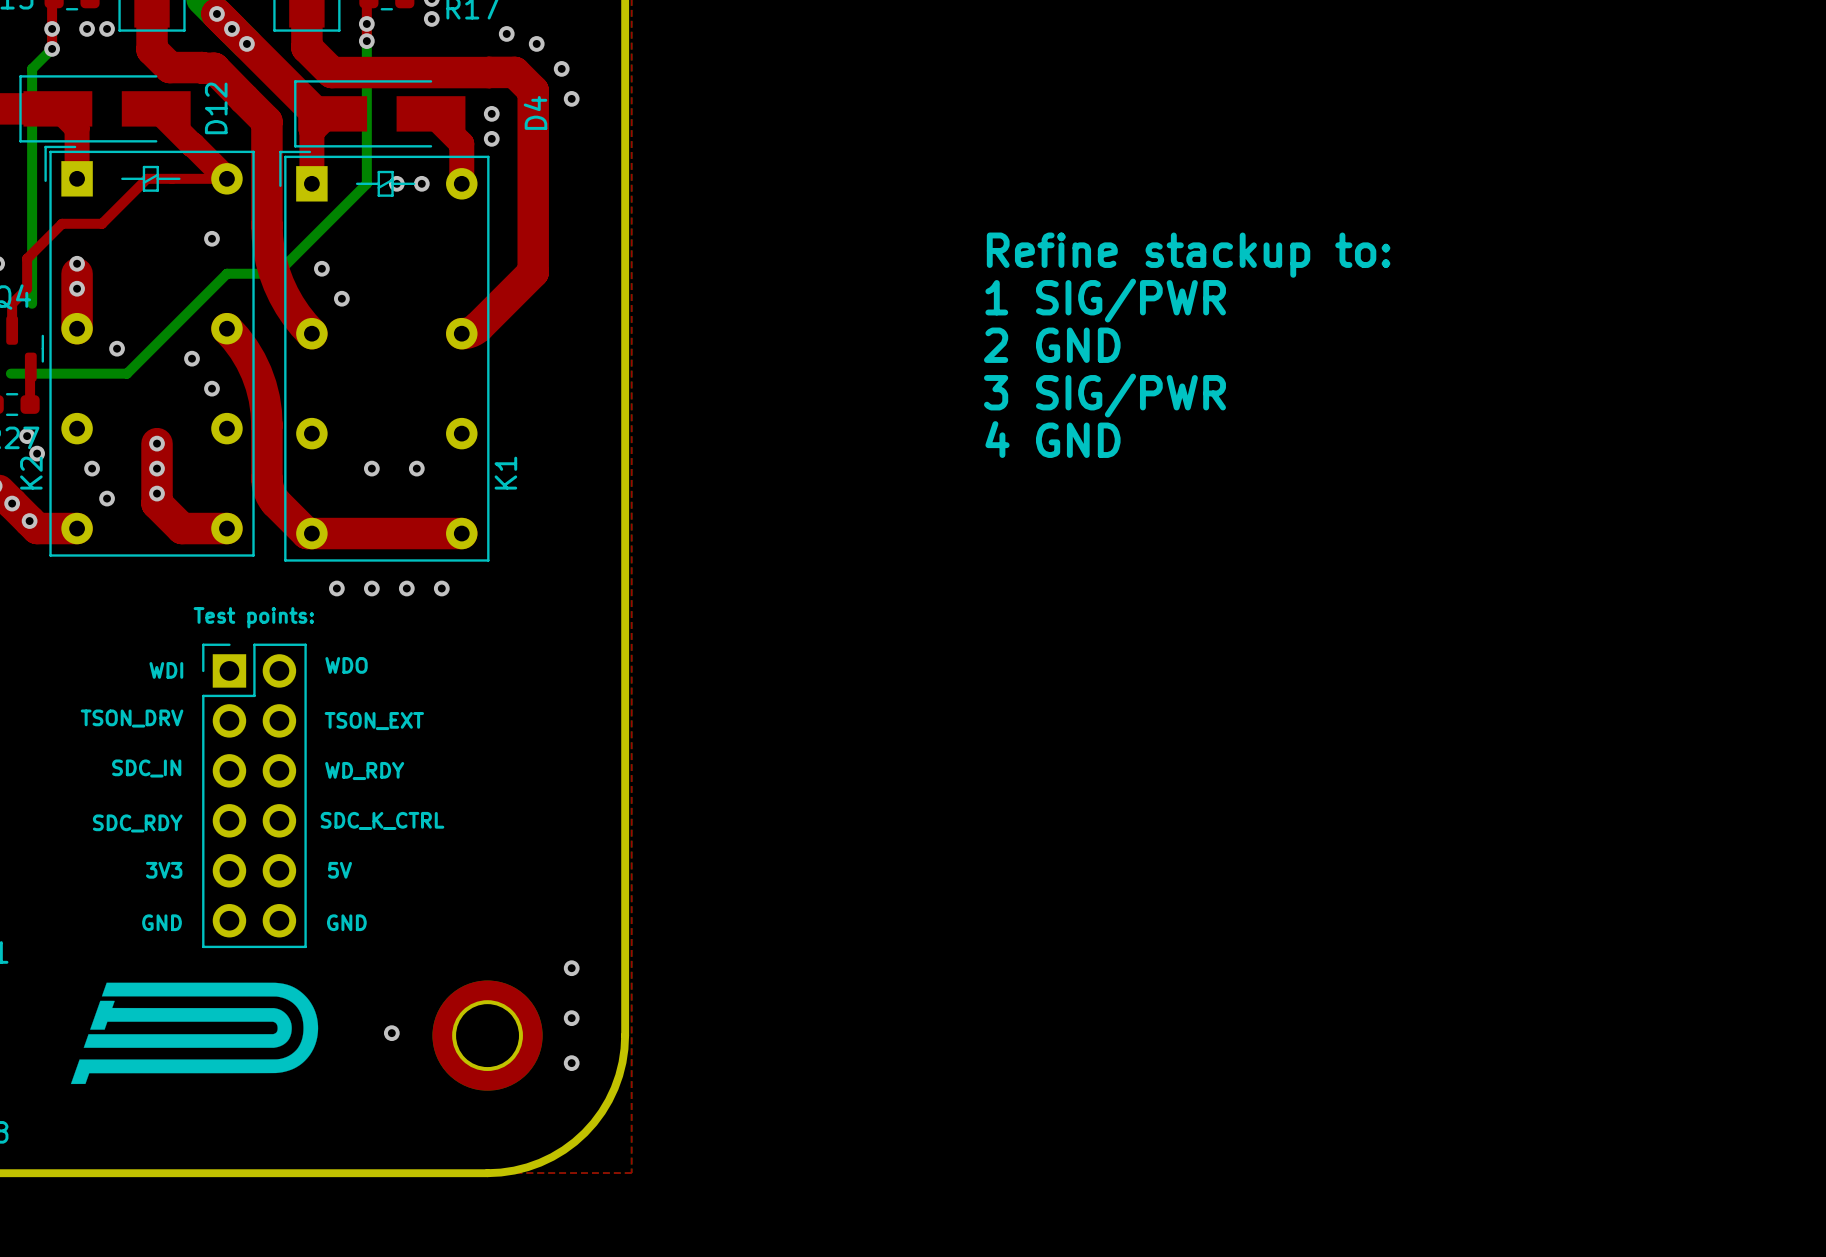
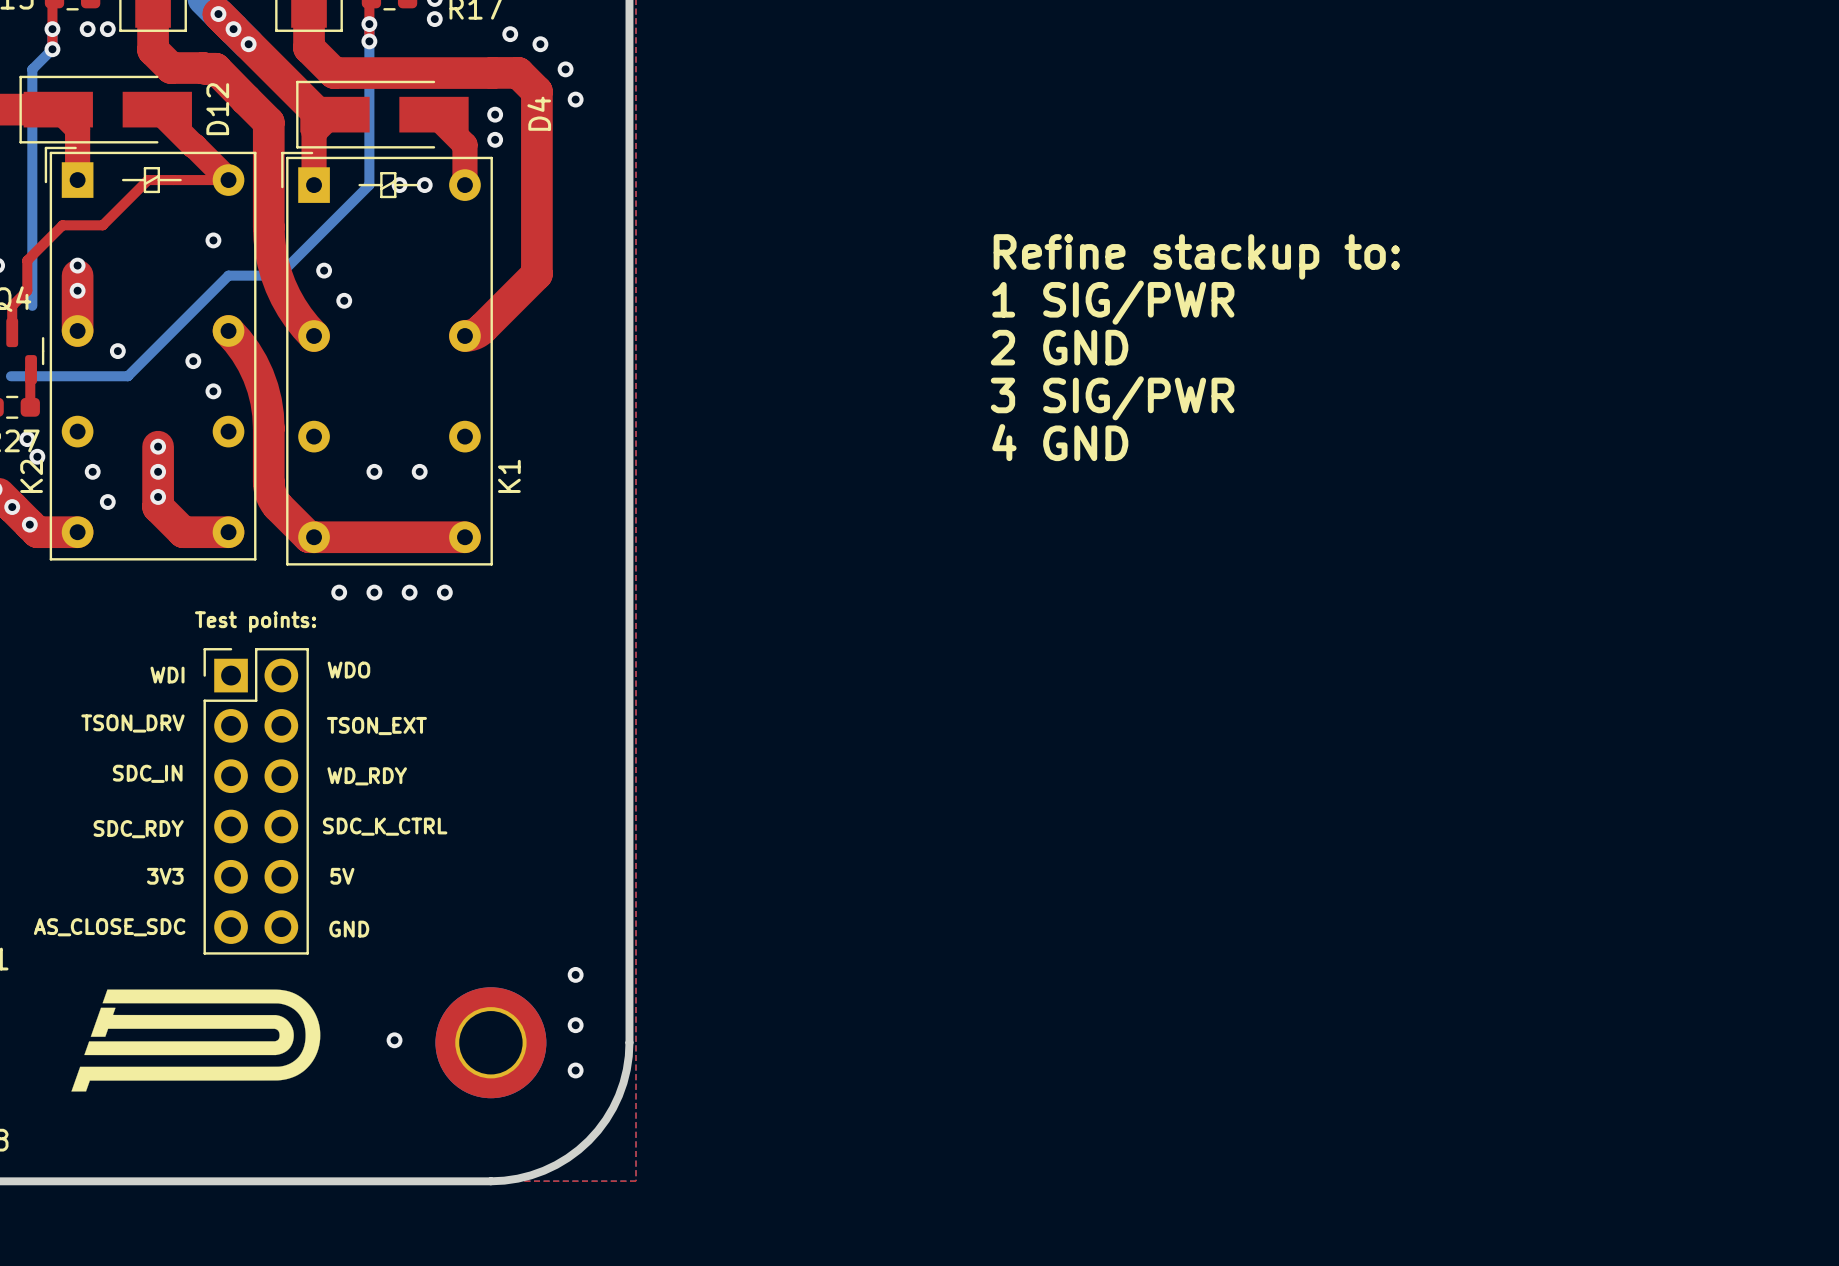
text: none -> AS_CLOSE_SDC (109, 927)
text: GND (162, 922) -> none

